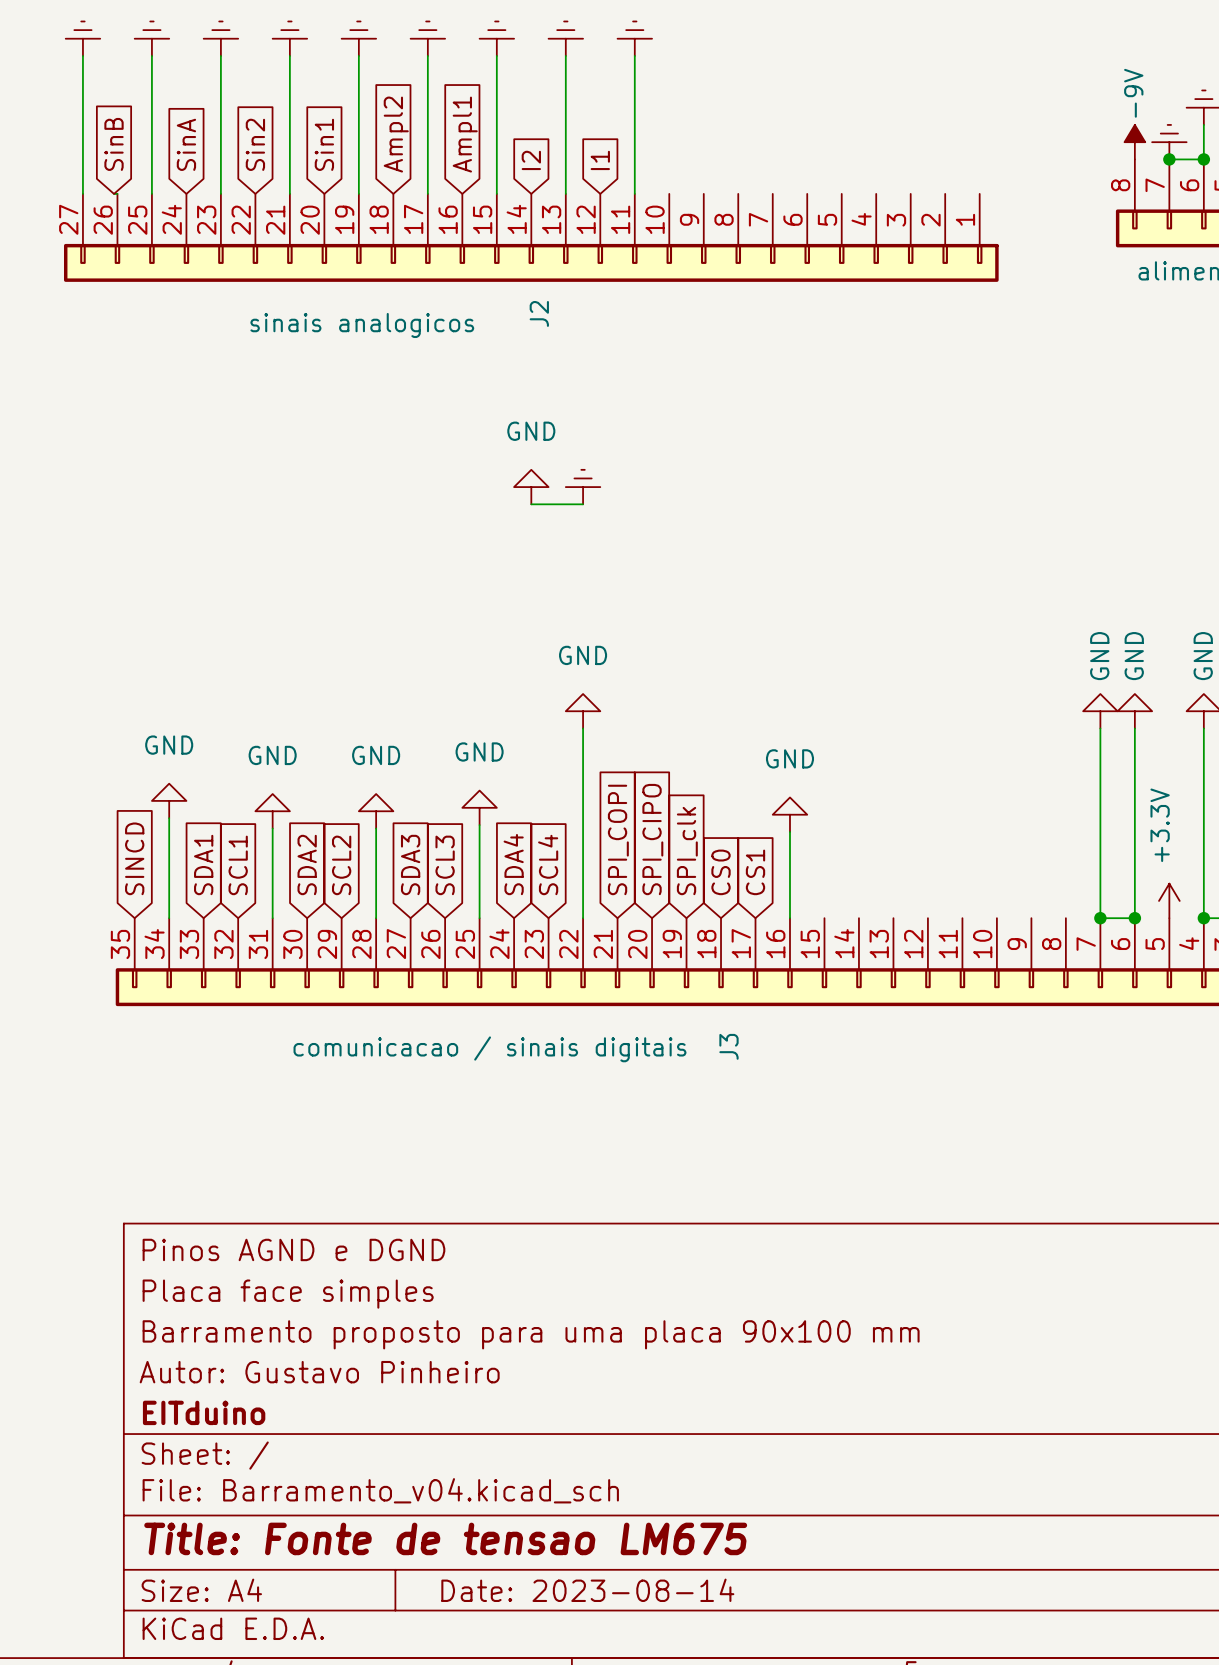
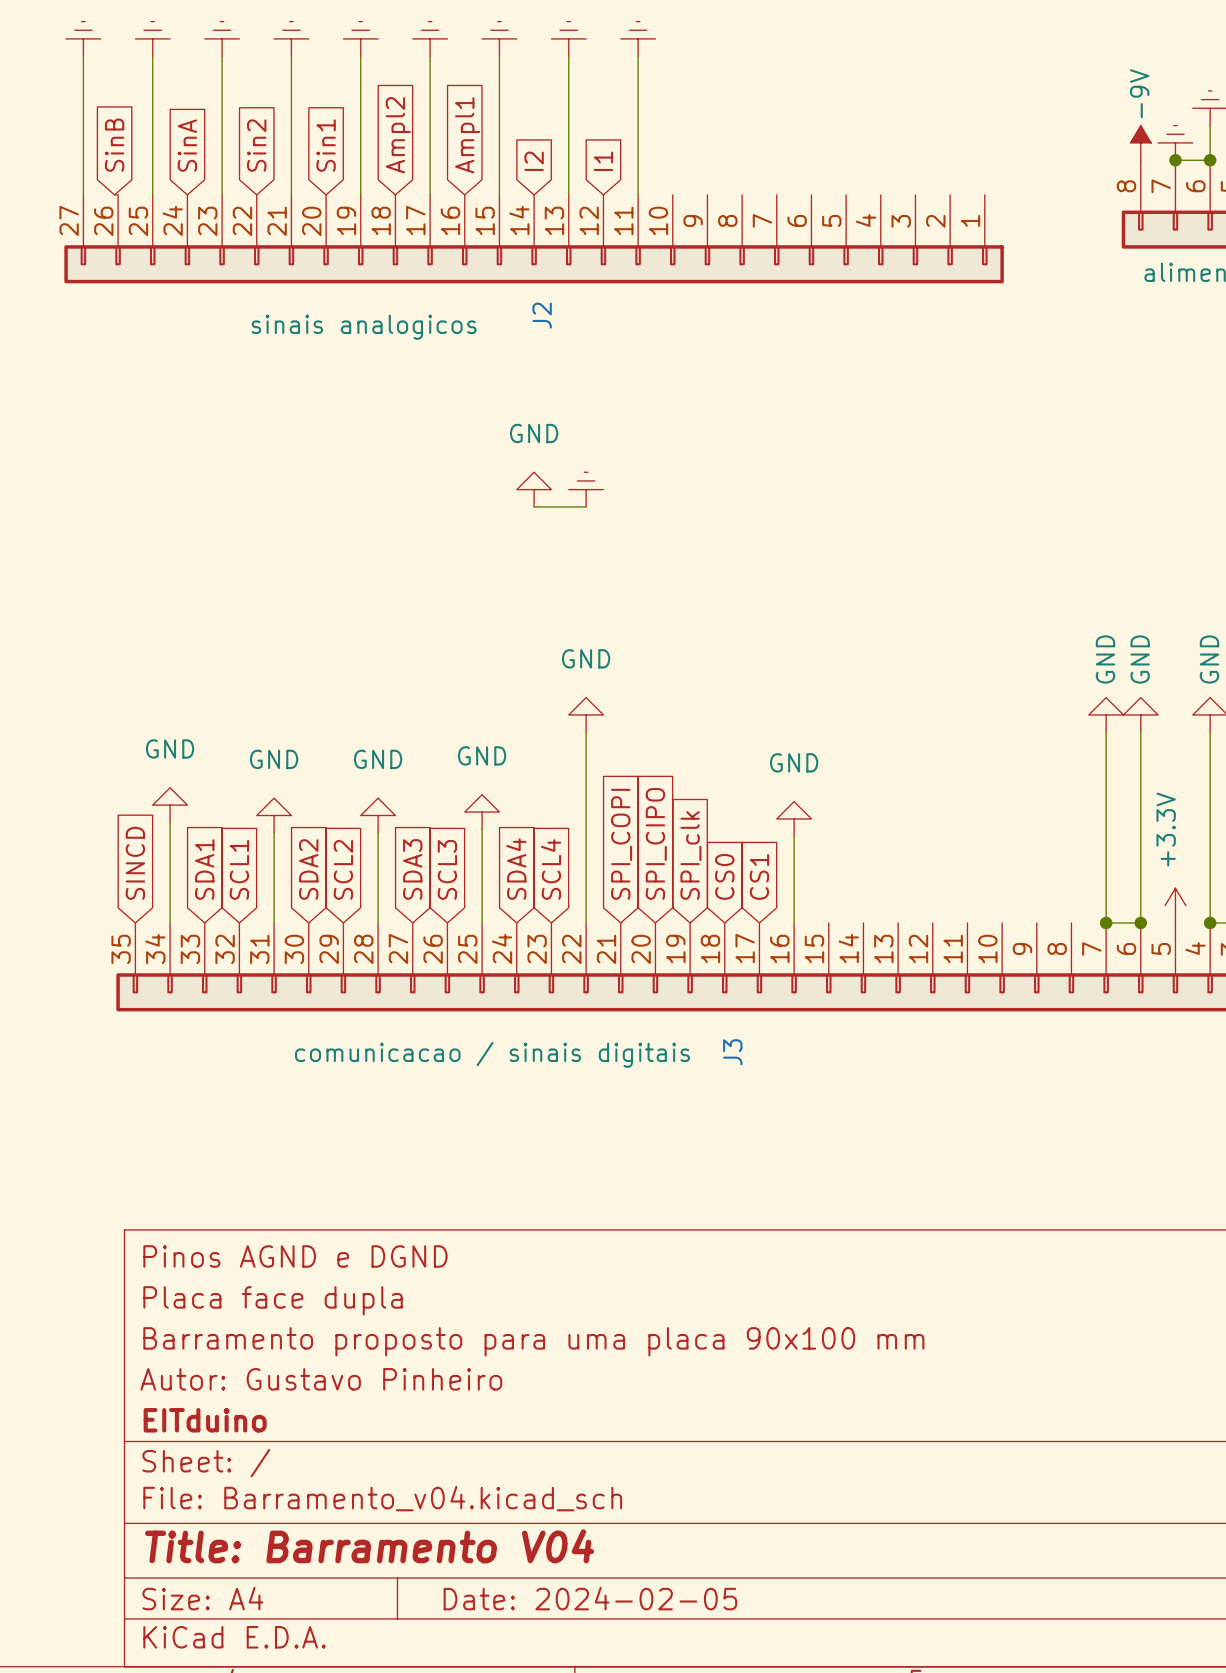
title block: Placa face simples (288, 1294) -> Placa face dupla (273, 1300)
title block: Title: Fonte de tensao LM675 (445, 1538) -> Title: Barramento V04 (369, 1546)
title block: Date: 2023-08-14 (587, 1590) -> Date: 2024-02-05 (590, 1598)

